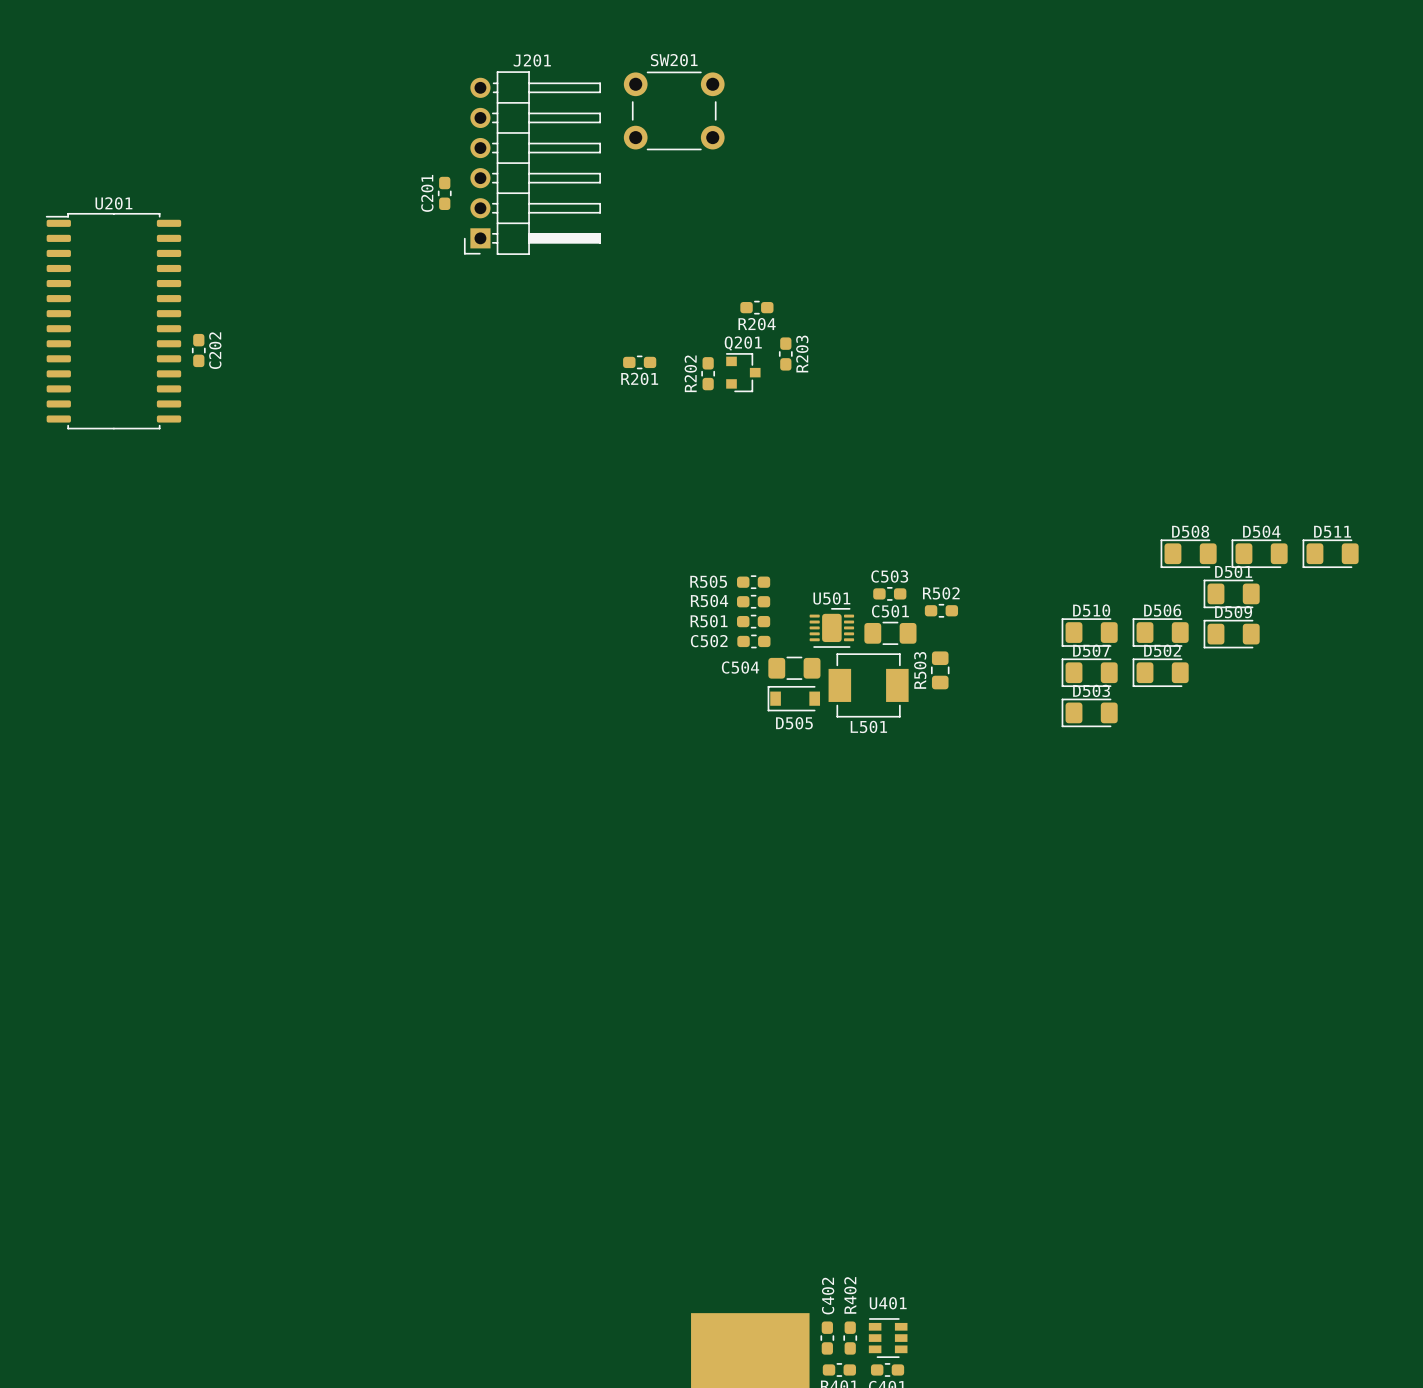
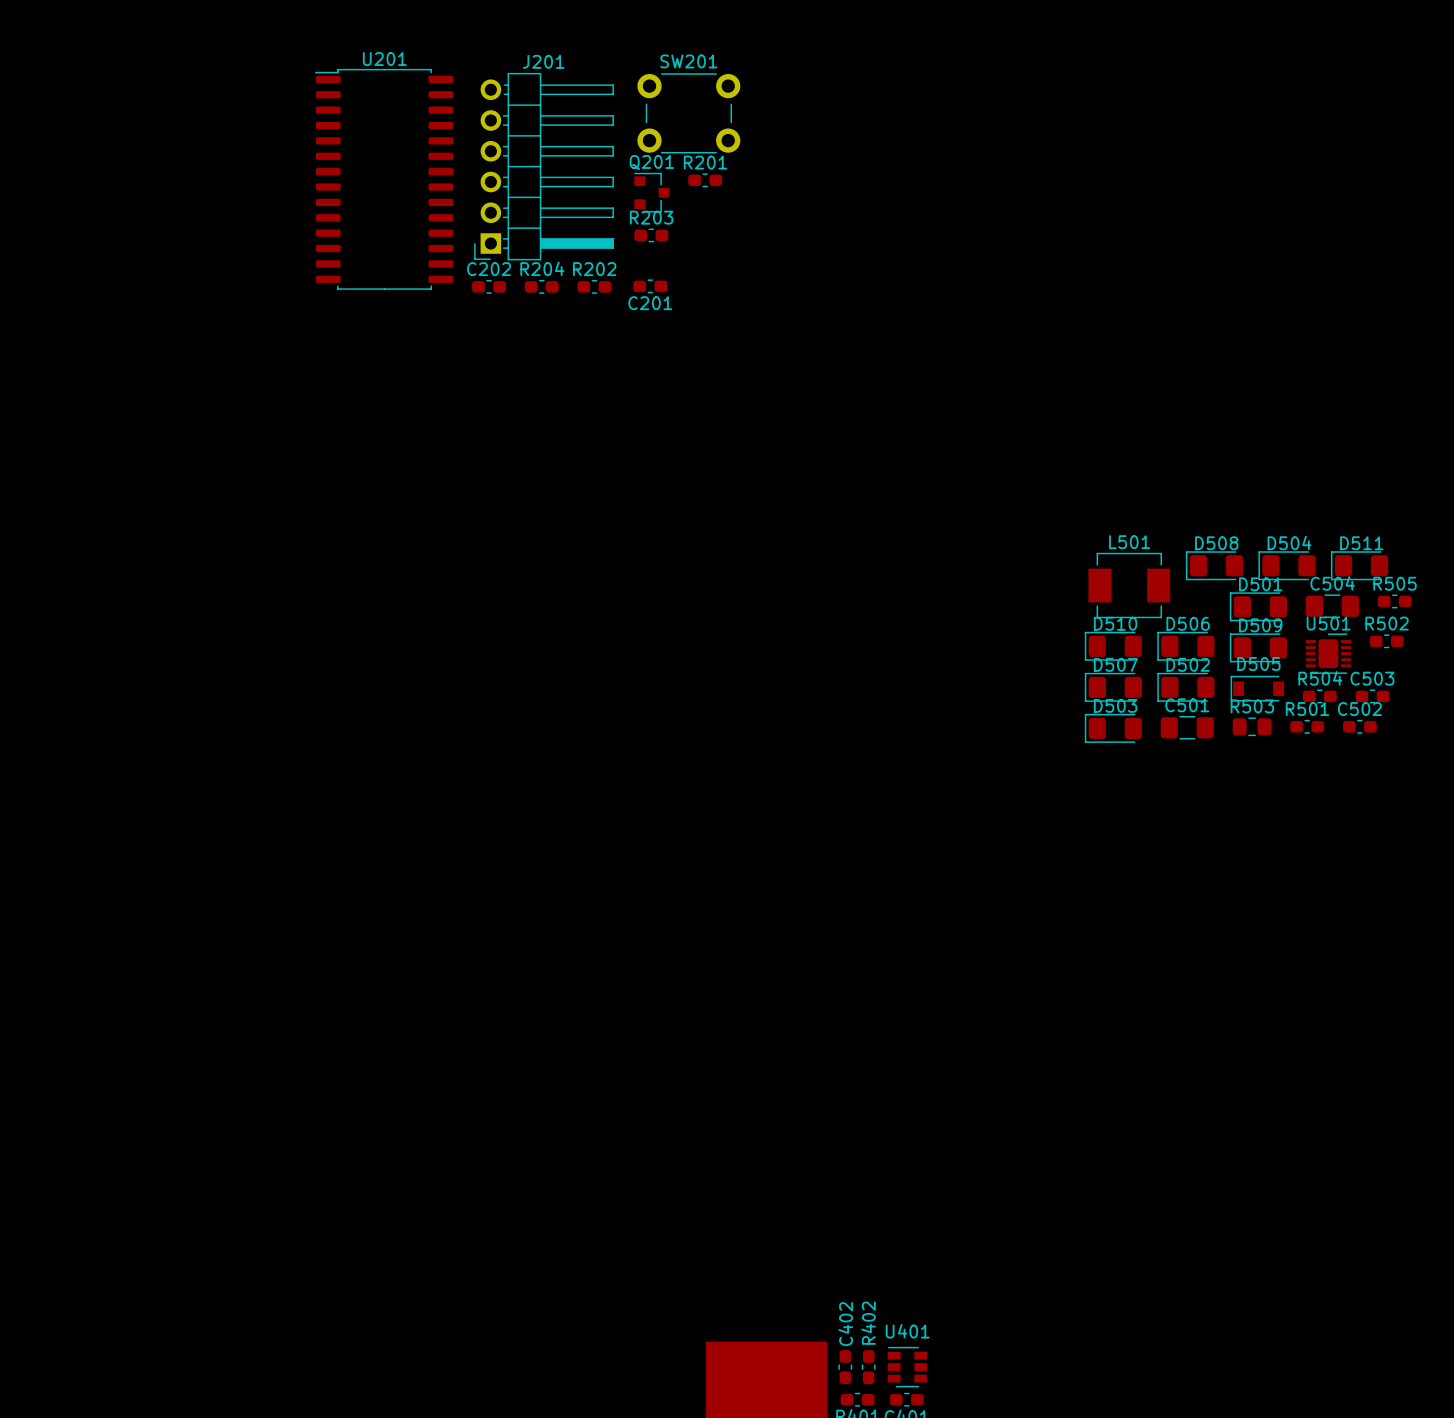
C201 name position: C201 (427, 193) -> C201 (650, 303)
C201 rotation: 0° (444, 193) -> 90° clockwise (650, 286)
C201 position: (444, 193) -> (650, 286)
R204 position: (756, 307) -> (541, 286)
U201 position: (113, 321) -> (384, 179)
R204 name position: R204 (757, 324) -> R204 (542, 268)
C202 rotation: 0° (198, 350) -> 90° clockwise (489, 286)
C202 position: (198, 350) -> (489, 286)
C202 name position: C202 (215, 350) -> C202 (489, 269)
R203 rotation: 0° (785, 353) -> 90° clockwise (651, 235)
R203 position: (785, 353) -> (651, 235)
R203 name position: R203 (802, 354) -> R203 (651, 217)
R201 position: (639, 362) -> (705, 180)
Q201 position: (743, 372) -> (651, 192)
R202 rotation: 0° (708, 373) -> 90° clockwise (594, 286)
R202 position: (708, 373) -> (594, 286)
R201 name position: R201 (639, 378) -> R201 (705, 162)
R505 name position: R505 (708, 581) -> R505 (1395, 583)
R505 position: (753, 582) -> (1394, 601)
C503 position: (889, 593) -> (1372, 696)
R504 name position: R504 (709, 601) -> R504 (1320, 678)
R504 position: (753, 601) -> (1319, 696)
R502 position: (941, 610) -> (1386, 641)
R501 name position: R501 (709, 621) -> R501 (1307, 709)
R501 position: (753, 621) -> (1307, 726)
U501 position: (831, 627) -> (1328, 653)
C501 position: (890, 633) -> (1187, 727)
C502 name position: C502 (709, 641) -> C502 (1359, 709)
C502 position: (753, 641) -> (1359, 726)
C504 name position: C504 (740, 667) -> C504 (1332, 583)
C504 position: (794, 668) -> (1332, 606)
R503 rotation: 0° (940, 670) -> 90° clockwise (1252, 726)
R503 position: (940, 670) -> (1252, 726)
L501 position: (868, 685) -> (1129, 585)
D505 position: (793, 698) -> (1257, 688)
D505 name position: D505 (794, 723) -> D505 (1258, 663)
L501 name position: L501 (868, 726) -> L501 (1129, 542)

